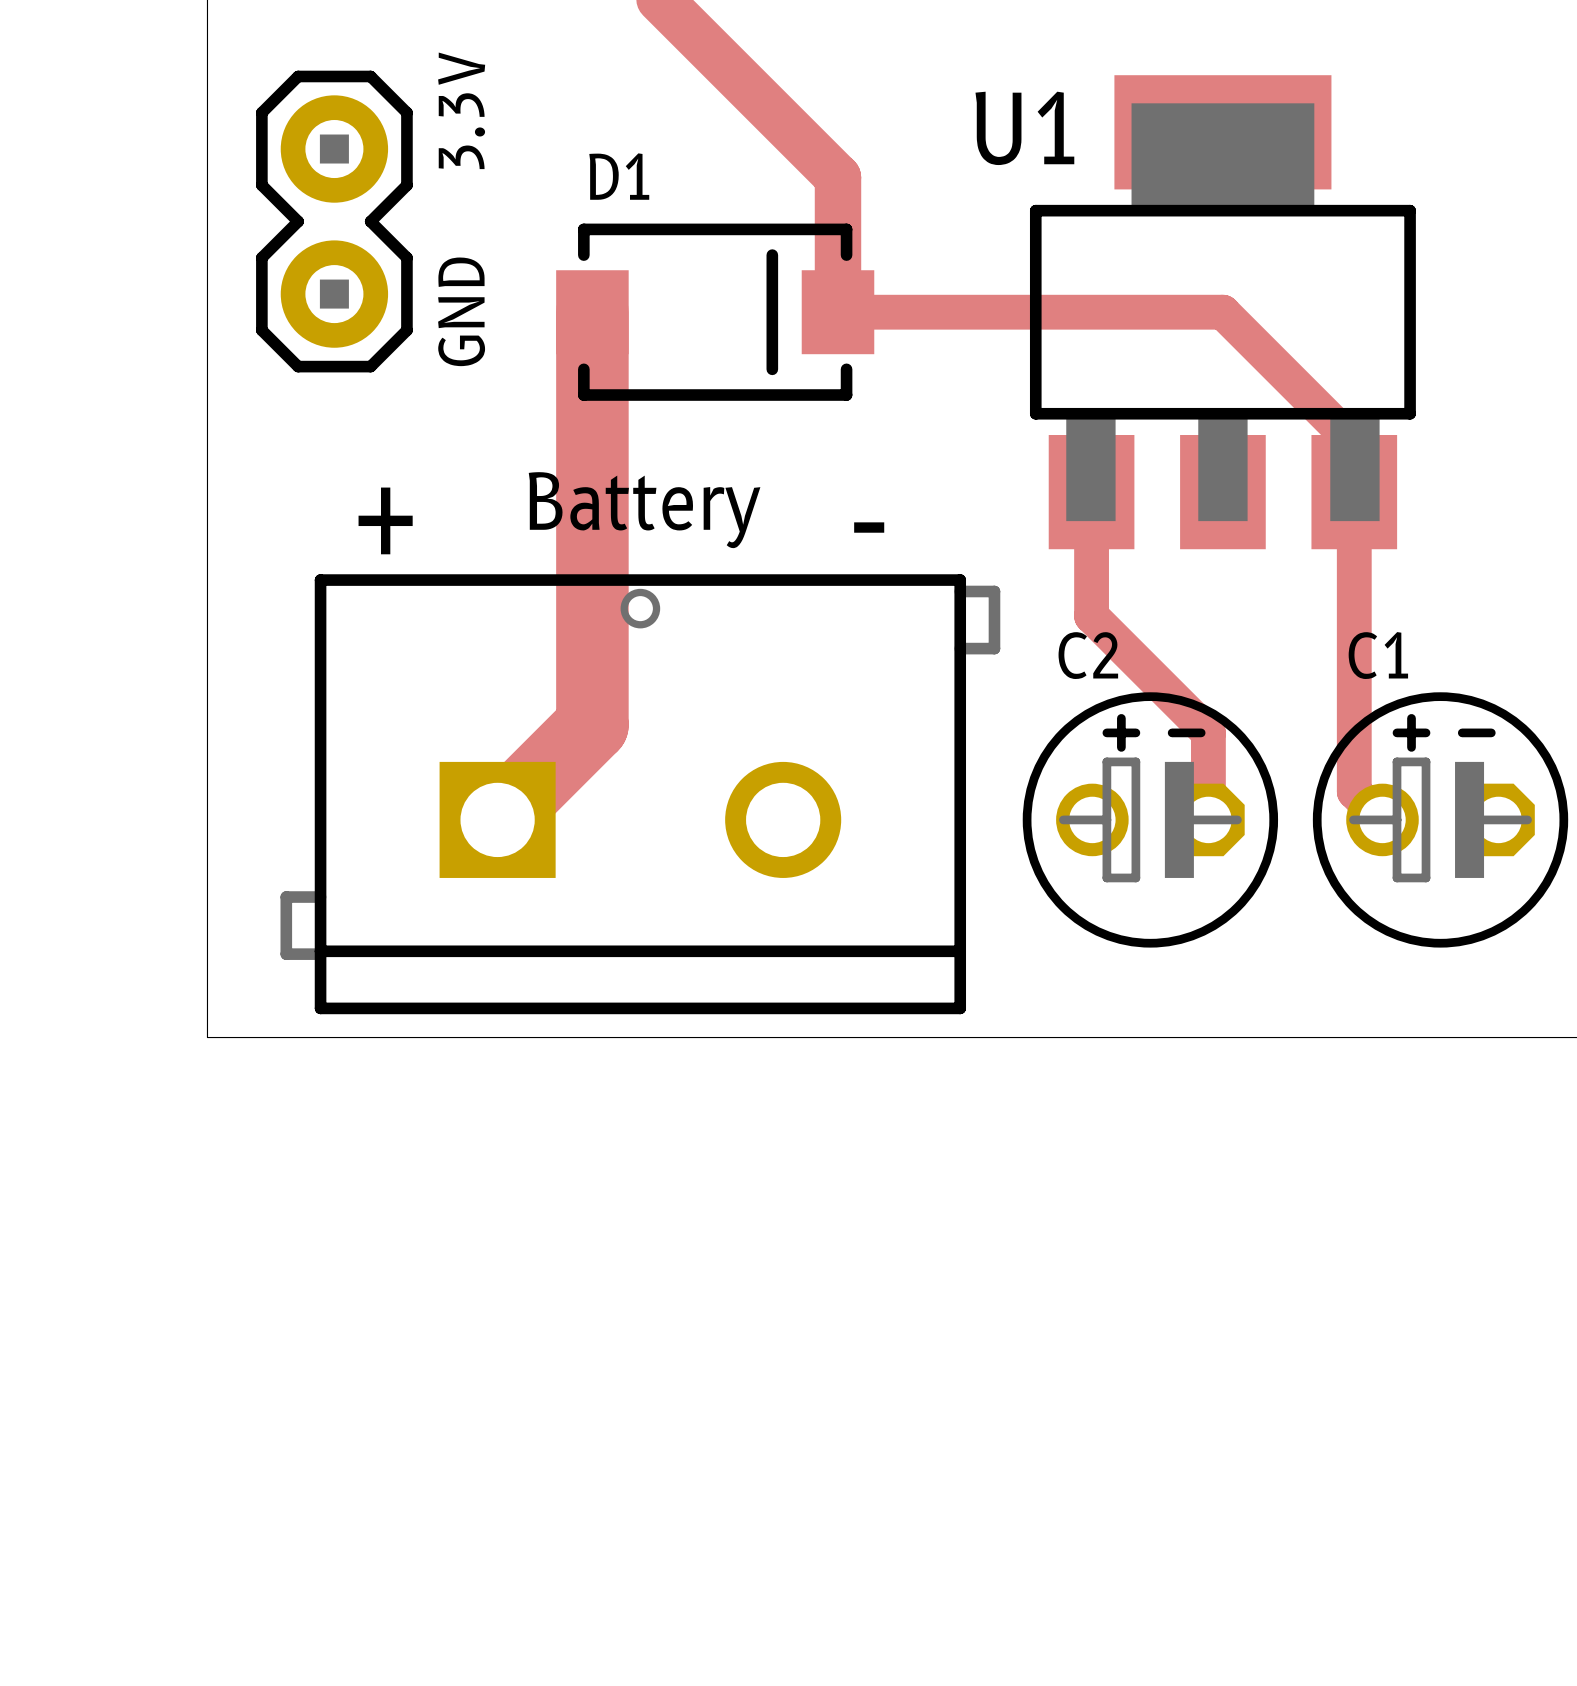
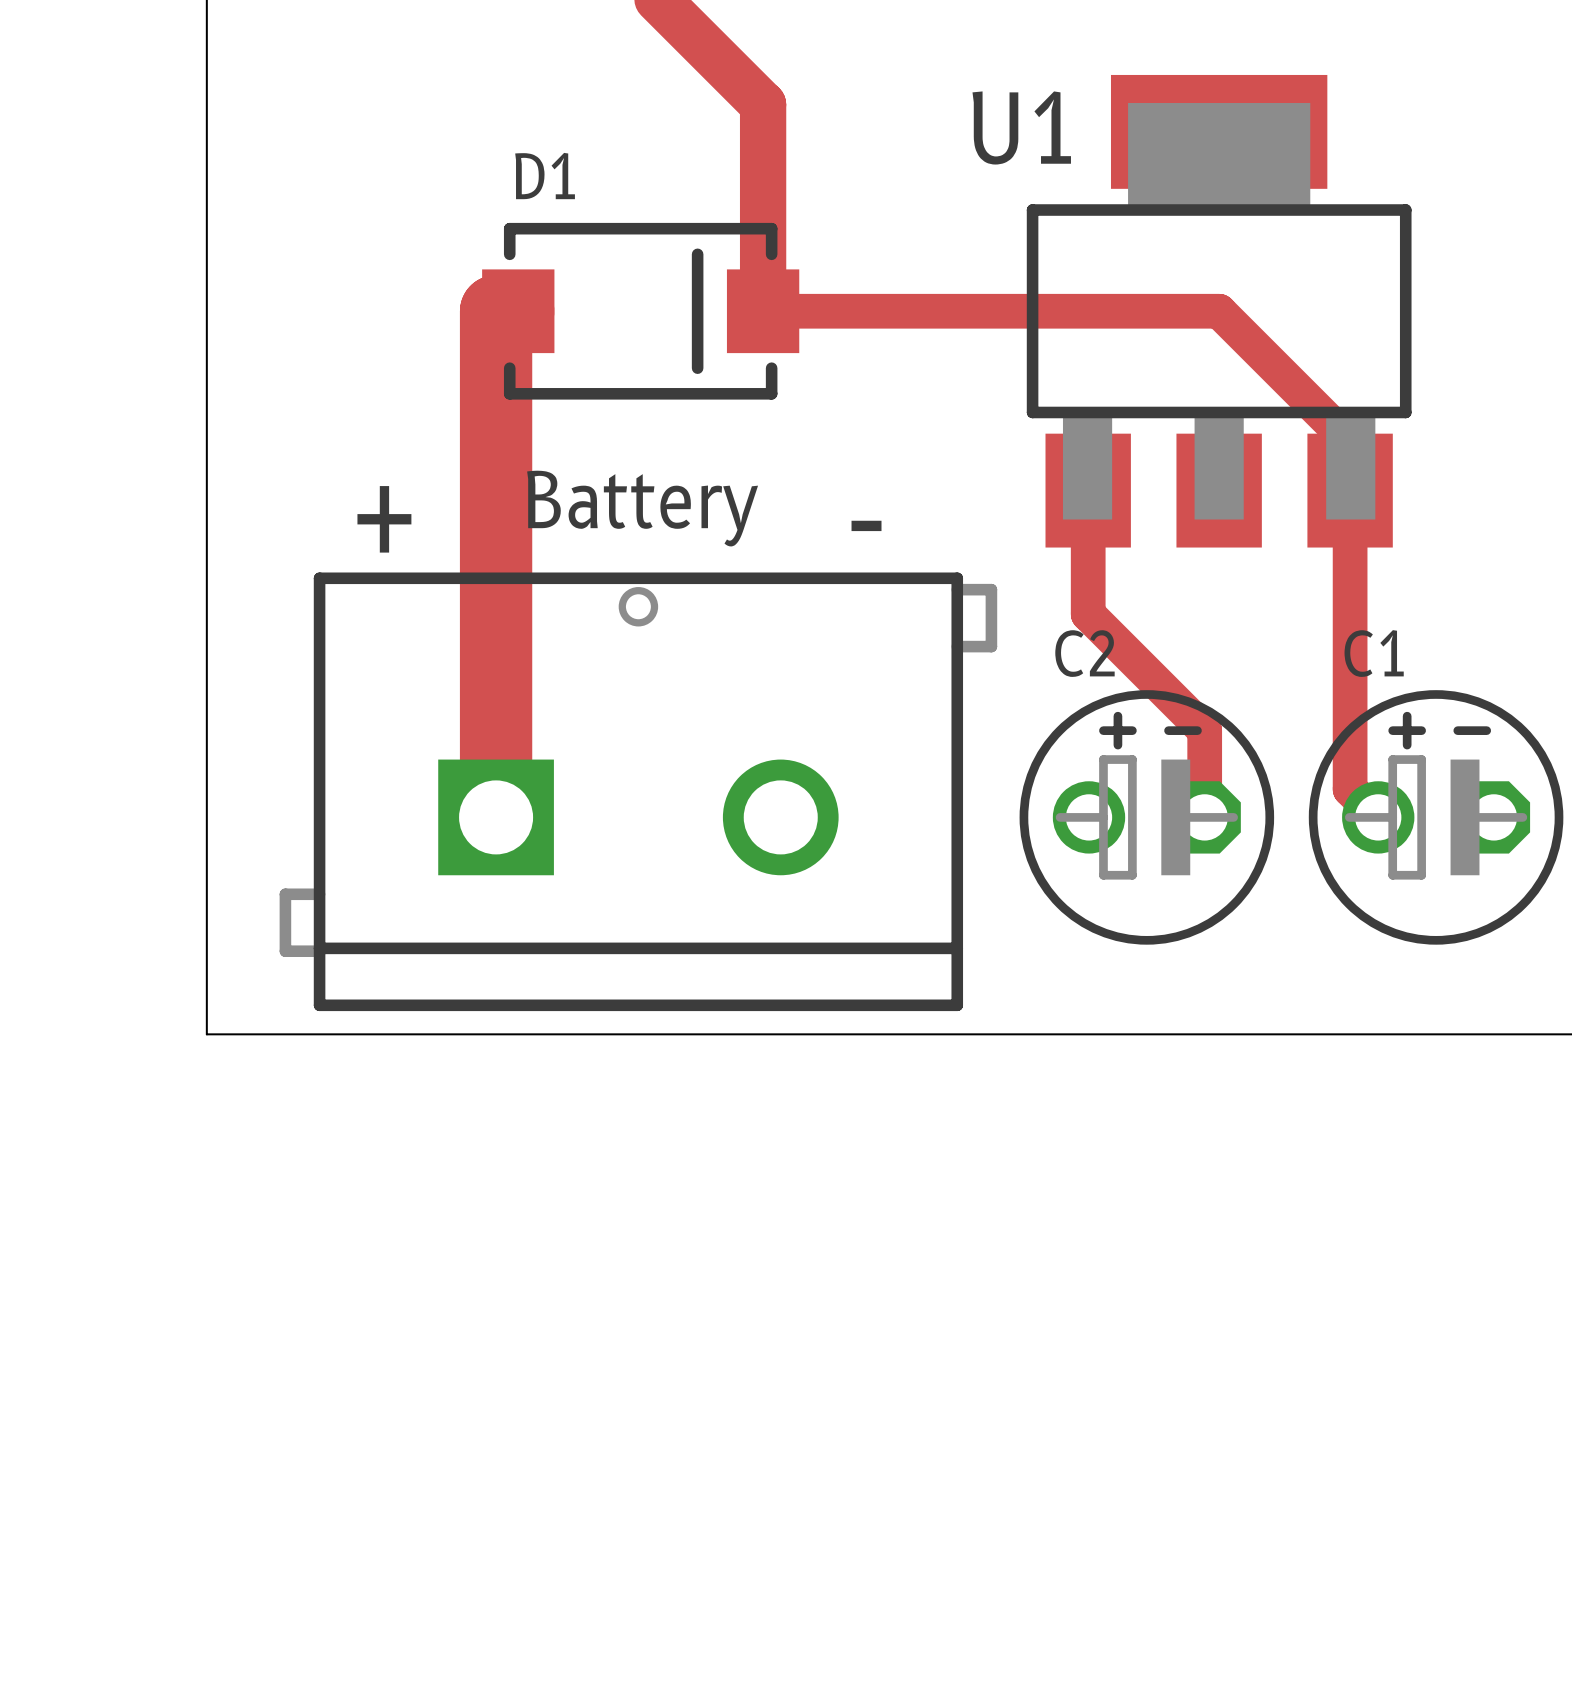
top track: (765, 104) (837, 177) (837, 312) -> (763, 104) (763, 311) (835, 311)
text: 3.3V (461, 110) -> none
part: (334, 221) -> none
text: GND (461, 311) -> none
top track: (592, 312) (592, 725) (497, 819) -> (518, 311) (496, 311) (496, 817)
D1 position: (715, 312) -> (640, 311)

